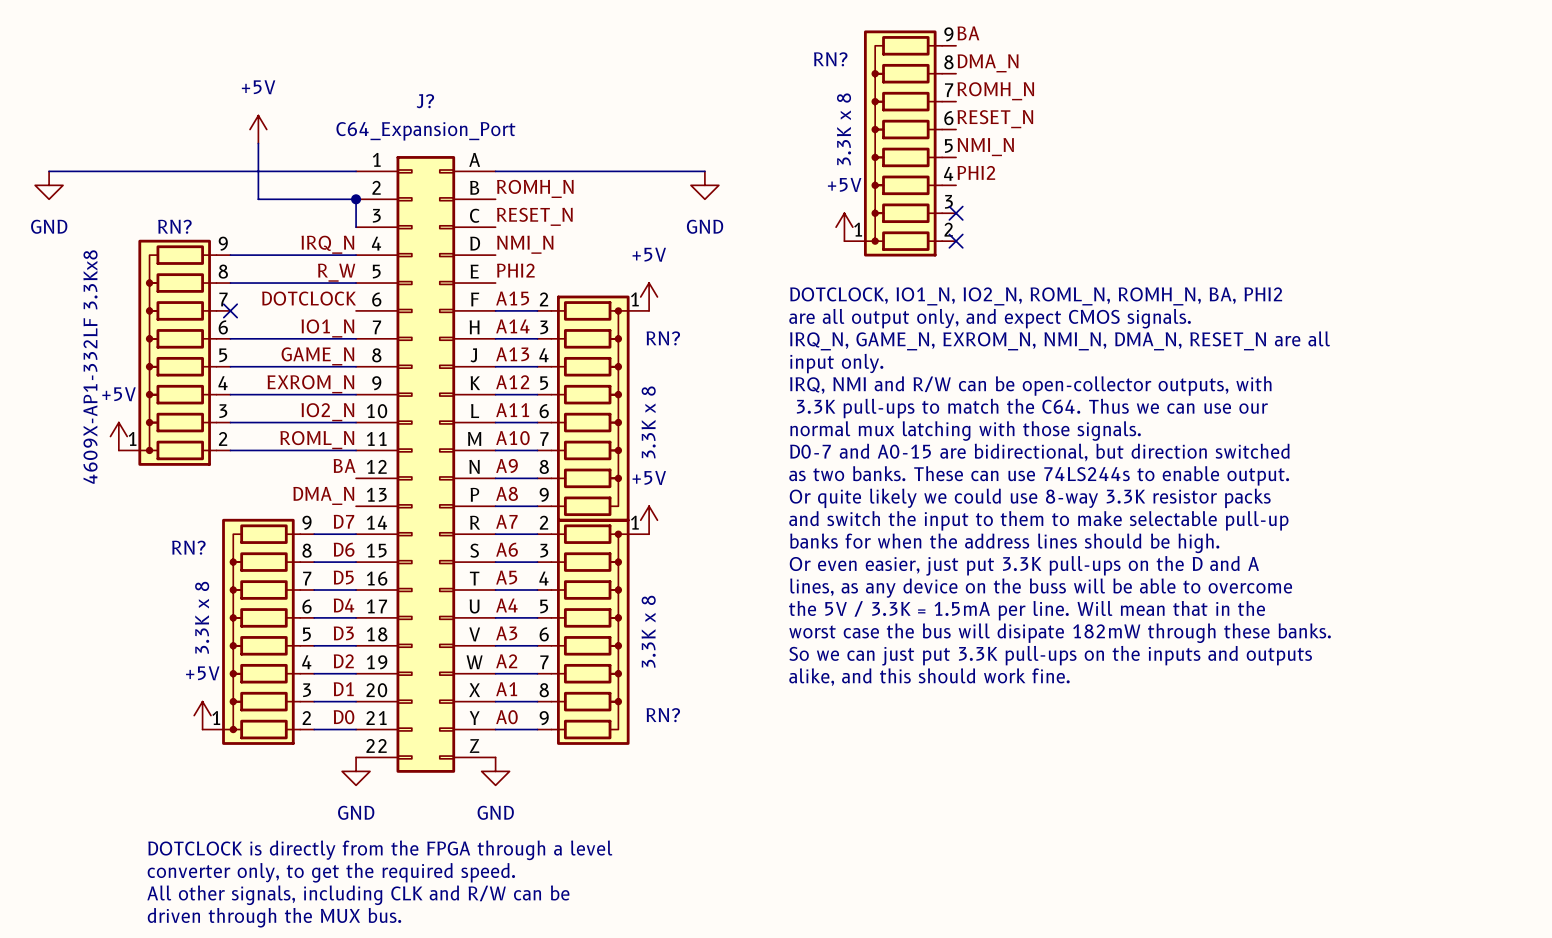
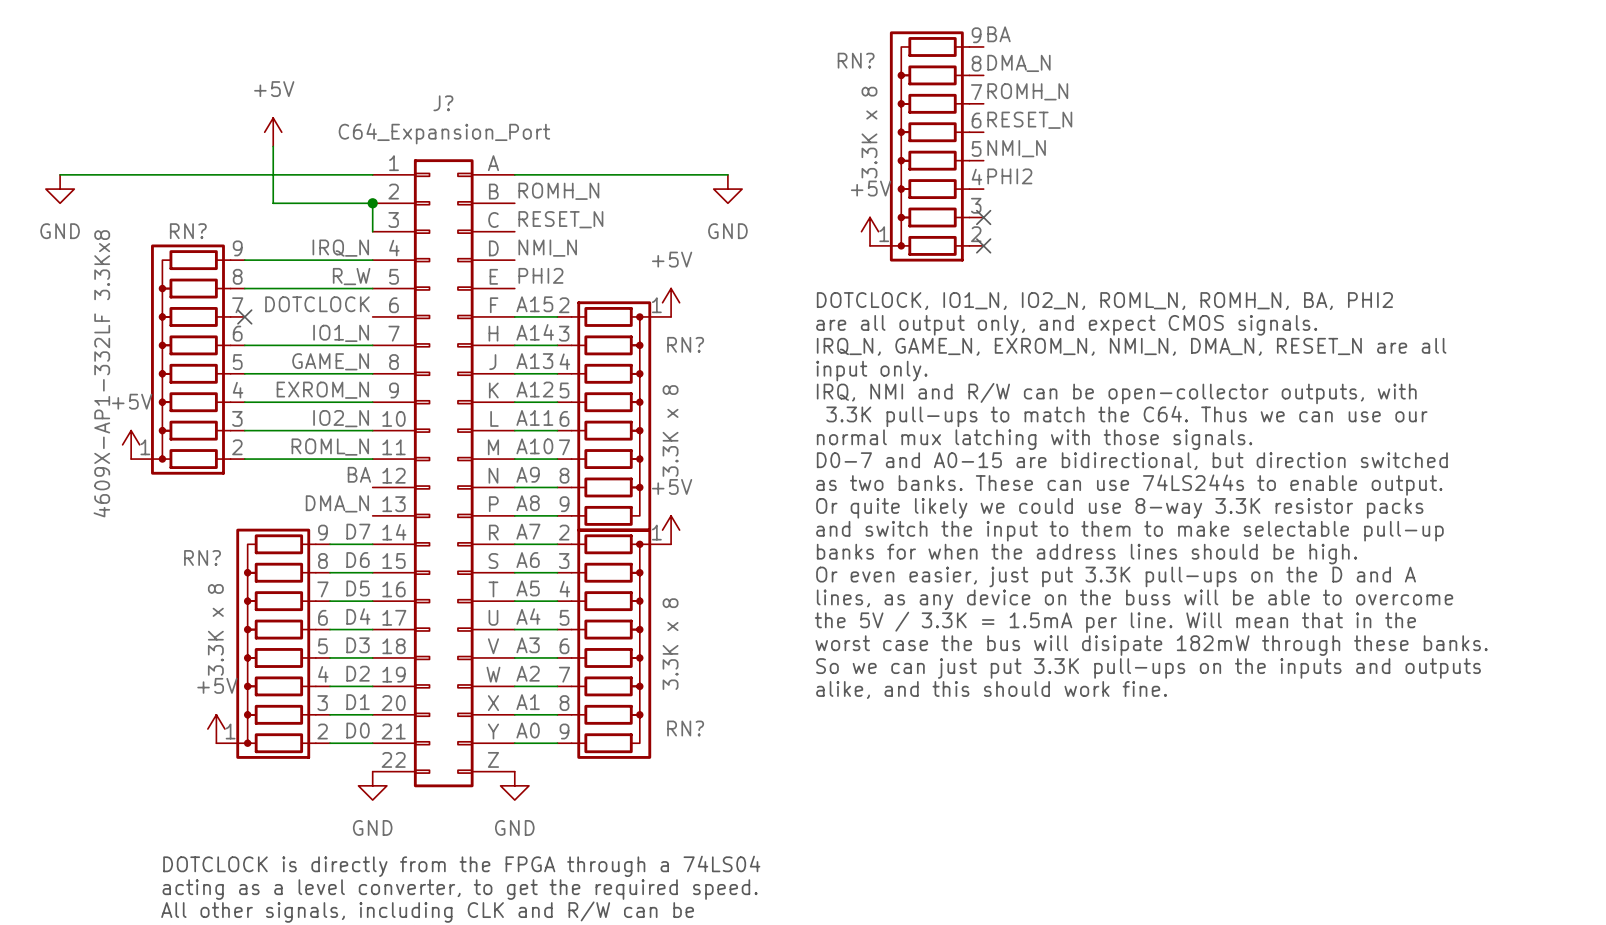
text: DOTCLOCK is directly from the FPGA through a level (380, 850) -> DOTCLOCK is directly from the FPGA through a 74LS04 (461, 866)
text: converter only, to get the required speed. (331, 872) -> acting as a level converter, to get the required speed. (460, 889)

